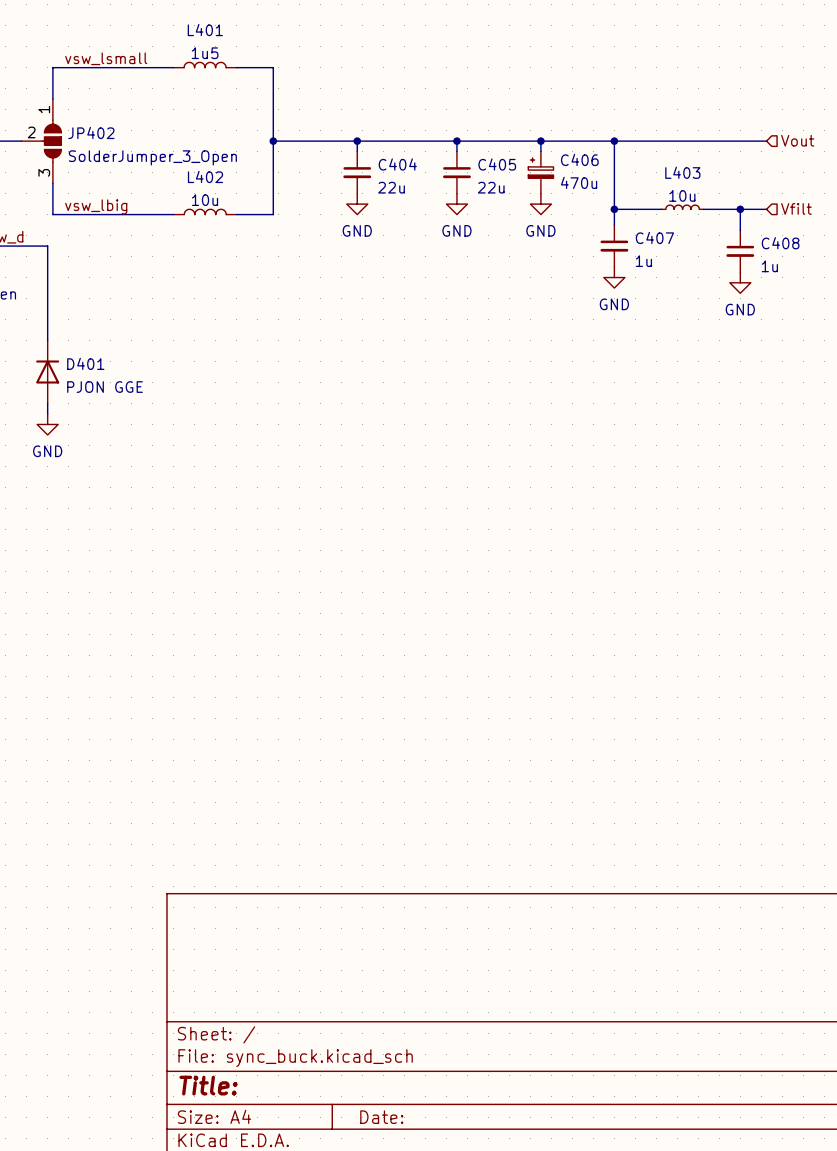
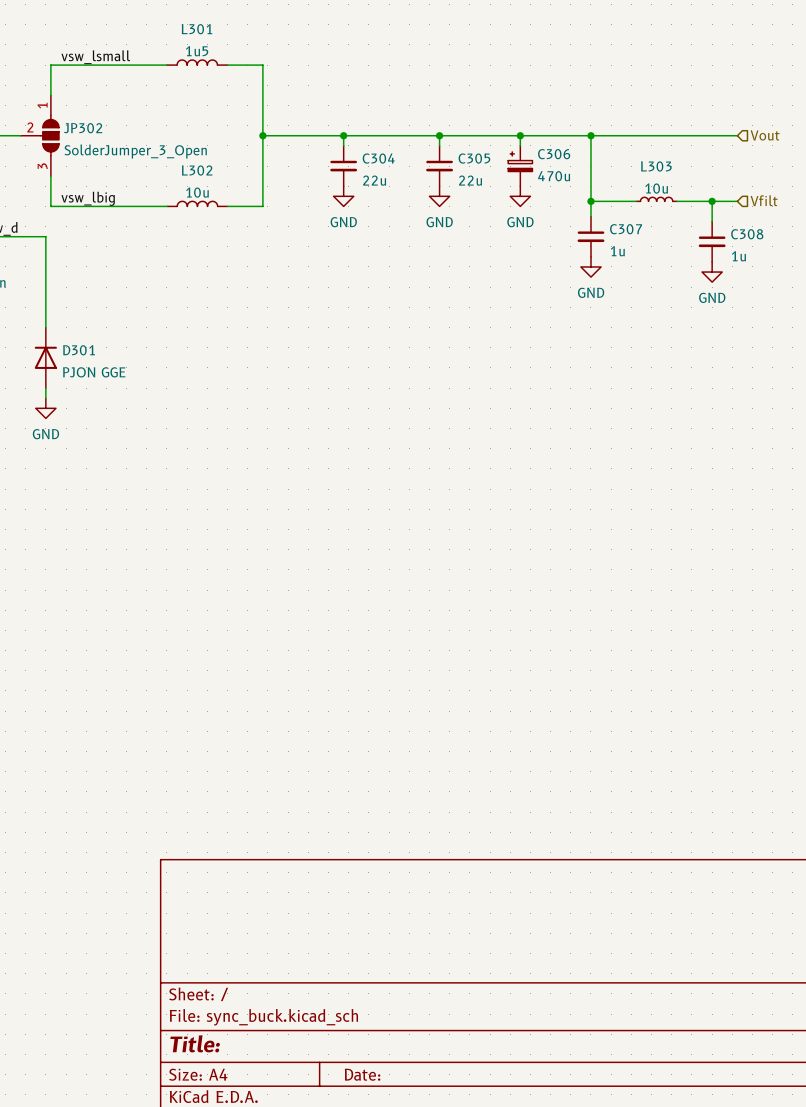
L401 name: L401 (205, 30) -> L301 (196, 29)
JP402 name: JP402 (91, 132) -> JP302 (83, 128)
C406 name: C406 (579, 159) -> C306 (554, 154)
C404 name: C404 (397, 164) -> C304 (378, 158)
C405 name: C405 (497, 164) -> C305 (474, 158)
L403 name: L403 (682, 172) -> L303 (656, 166)
L402 name: L402 (205, 176) -> L302 (197, 170)
C407 name: C407 (654, 237) -> C307 (626, 229)
C408 name: C408 (780, 243) -> C308 (747, 234)
D401 name: D401 (85, 363) -> D301 (79, 350)

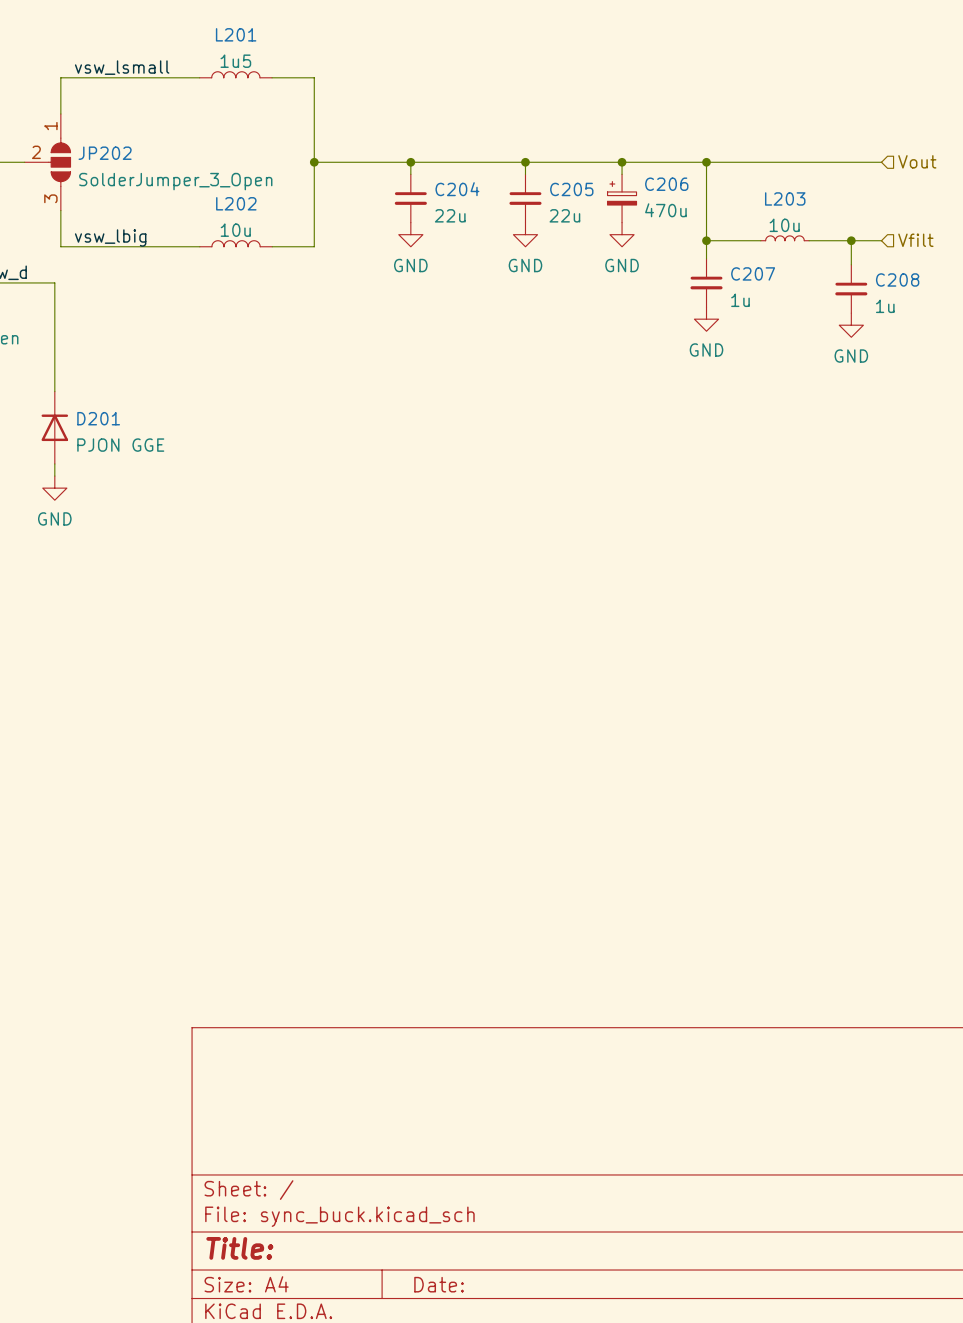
L301 name: L301 (196, 29) -> L201 (236, 34)
JP302 name: JP302 (83, 128) -> JP202 (105, 153)
C306 name: C306 (554, 154) -> C206 (666, 184)
C304 name: C304 (378, 158) -> C204 (457, 189)
C305 name: C305 (474, 158) -> C205 (571, 189)
L303 name: L303 (656, 166) -> L203 (785, 198)
L302 name: L302 (197, 170) -> L202 (236, 203)
C307 name: C307 (626, 229) -> C207 (753, 273)
C308 name: C308 (747, 234) -> C208 (897, 279)
D301 name: D301 (79, 350) -> D201 (98, 418)

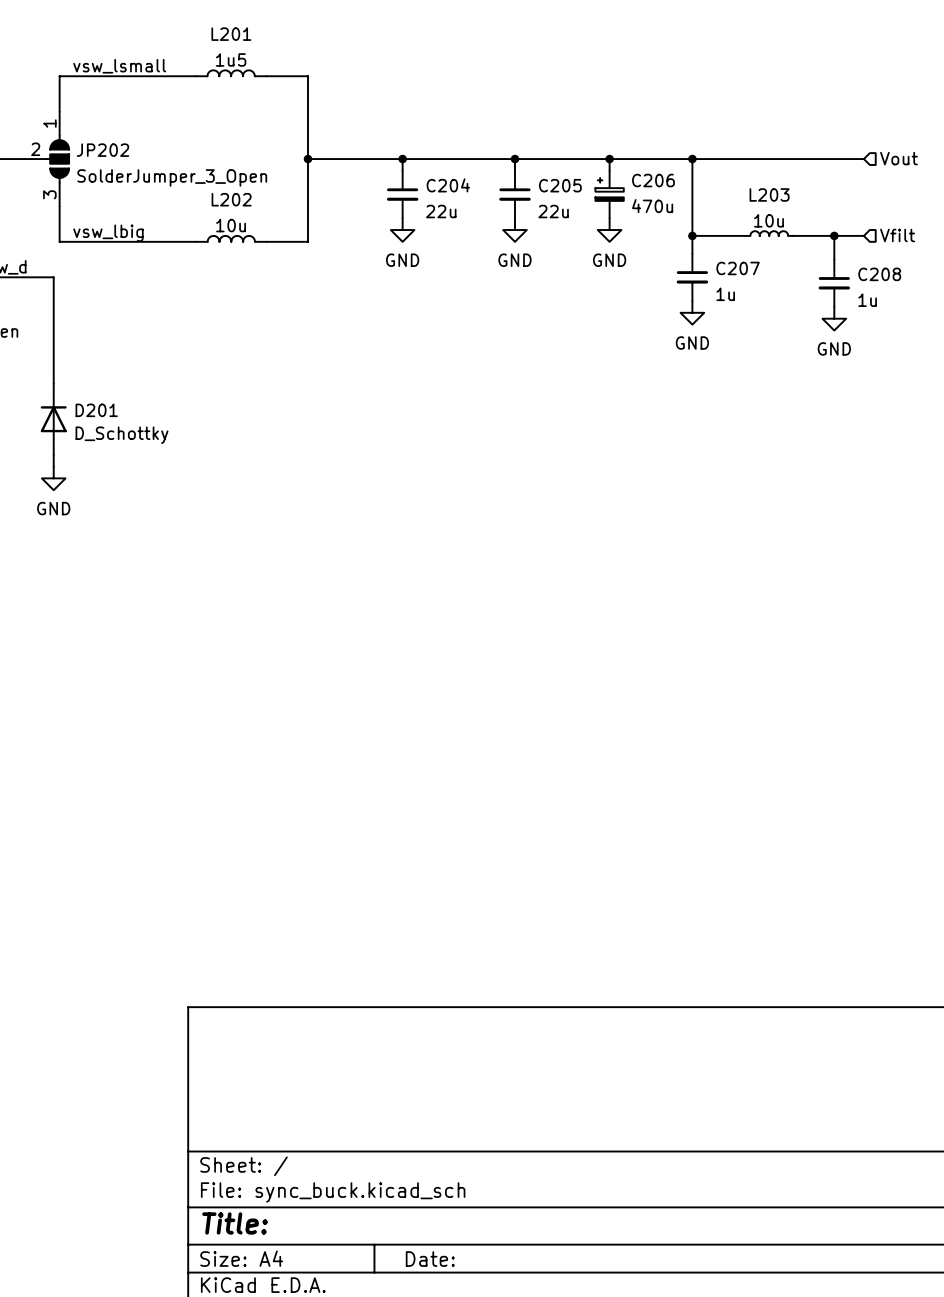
D201 value: PJON GGE (120, 445) -> D_Schottky (122, 435)

